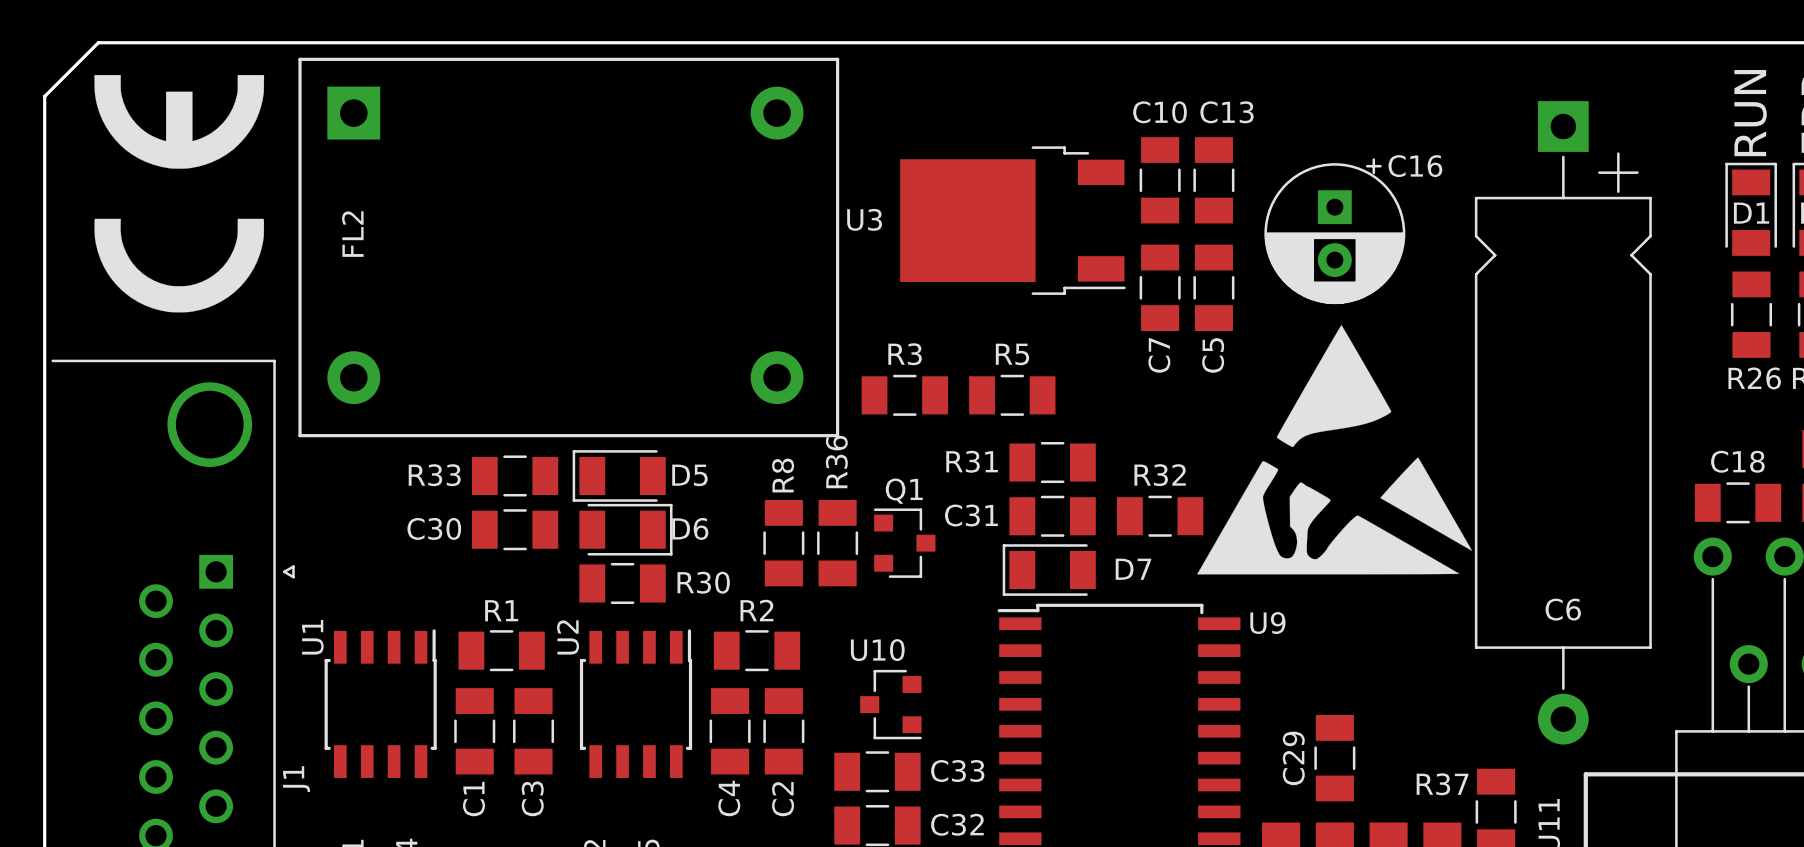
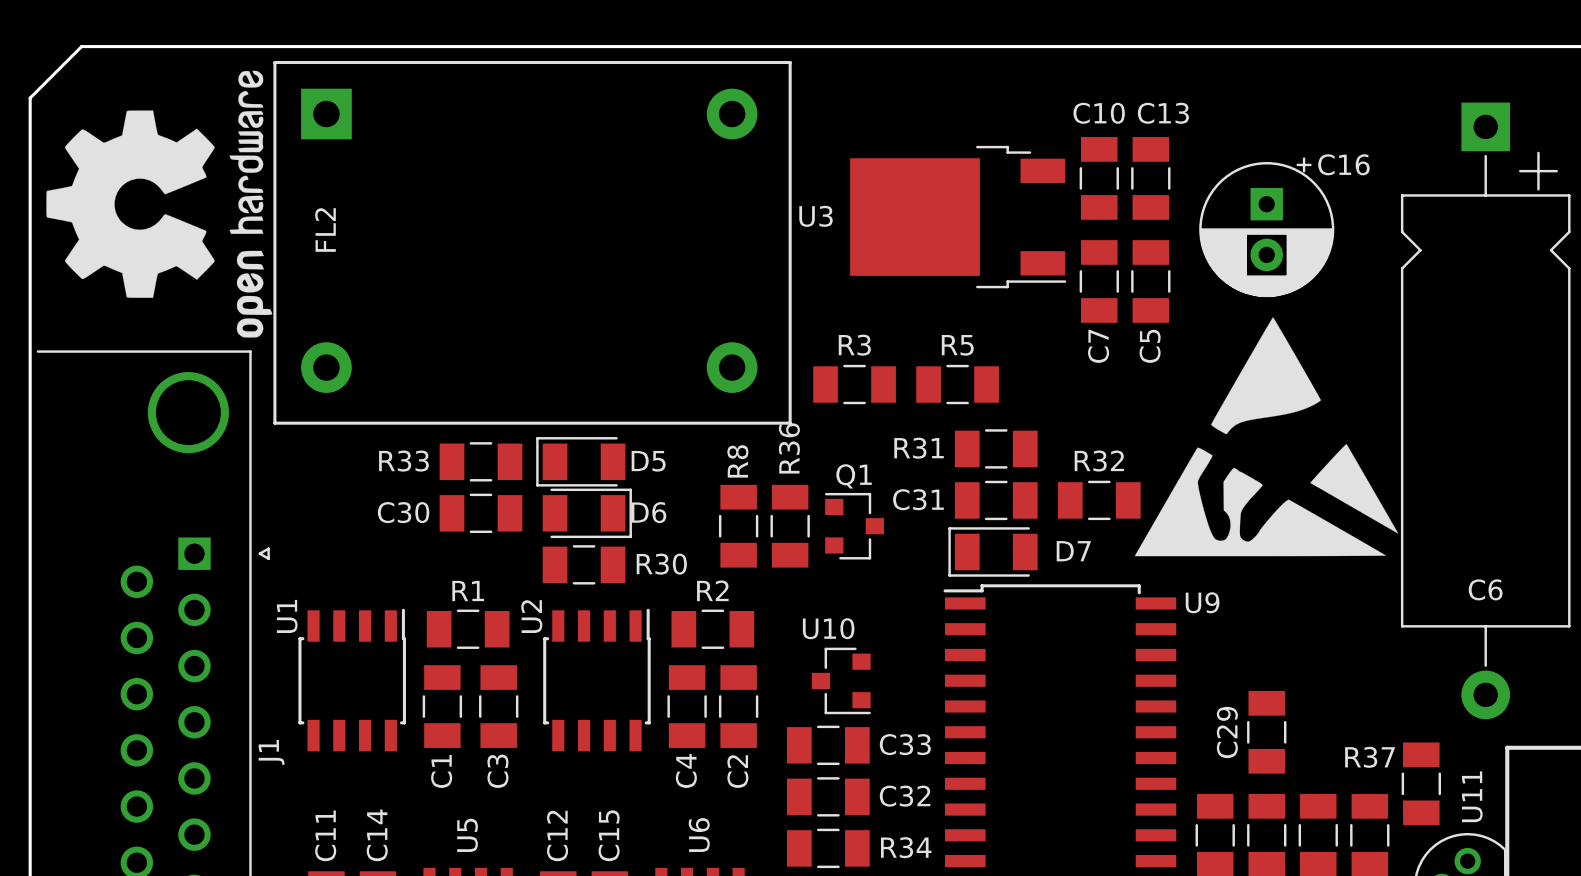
drawing shape: [94, 74, 265, 313] -> [46, 70, 273, 338]

